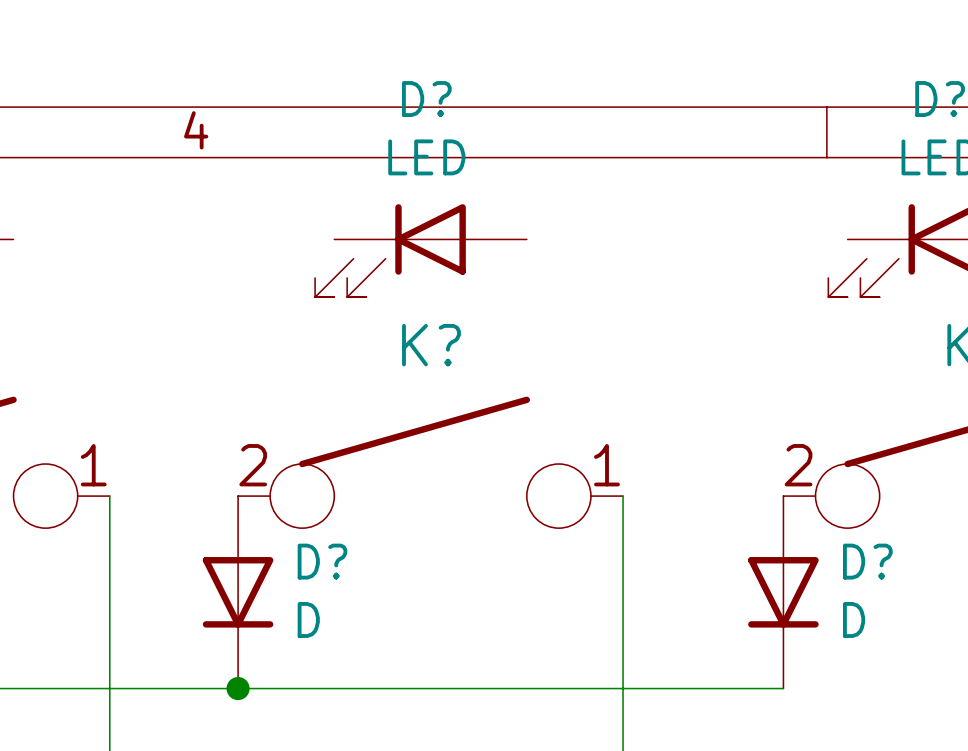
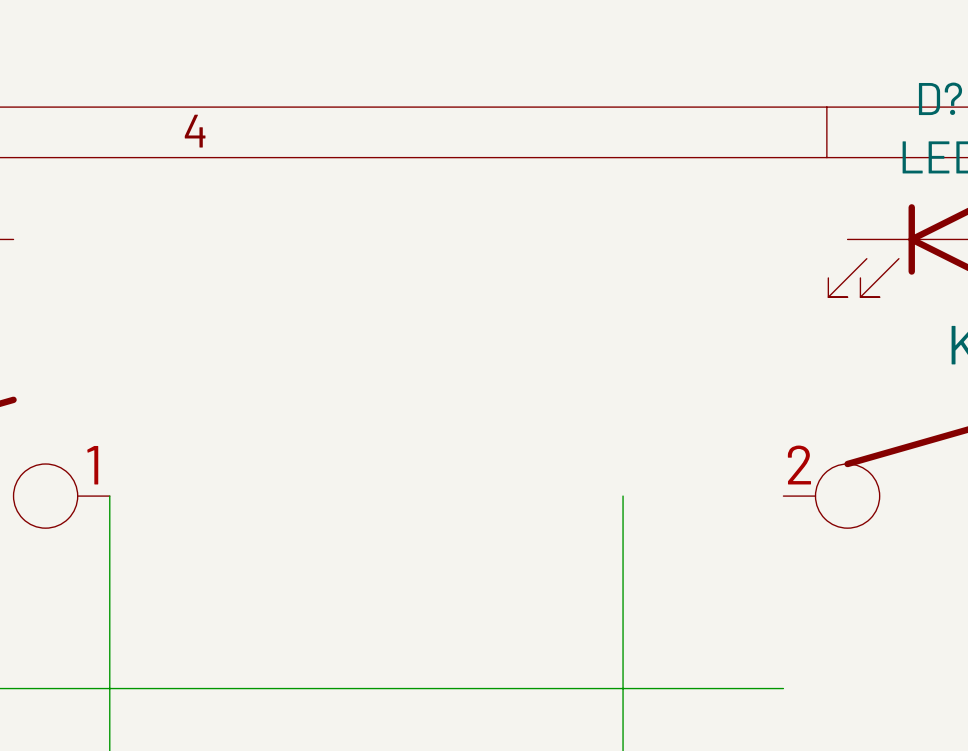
D?: LED (420, 250) -> none
K?: (430, 462) -> none
D?: D (238, 592) -> none
D?: D (783, 592) -> none
junction: (238, 688) -> none

